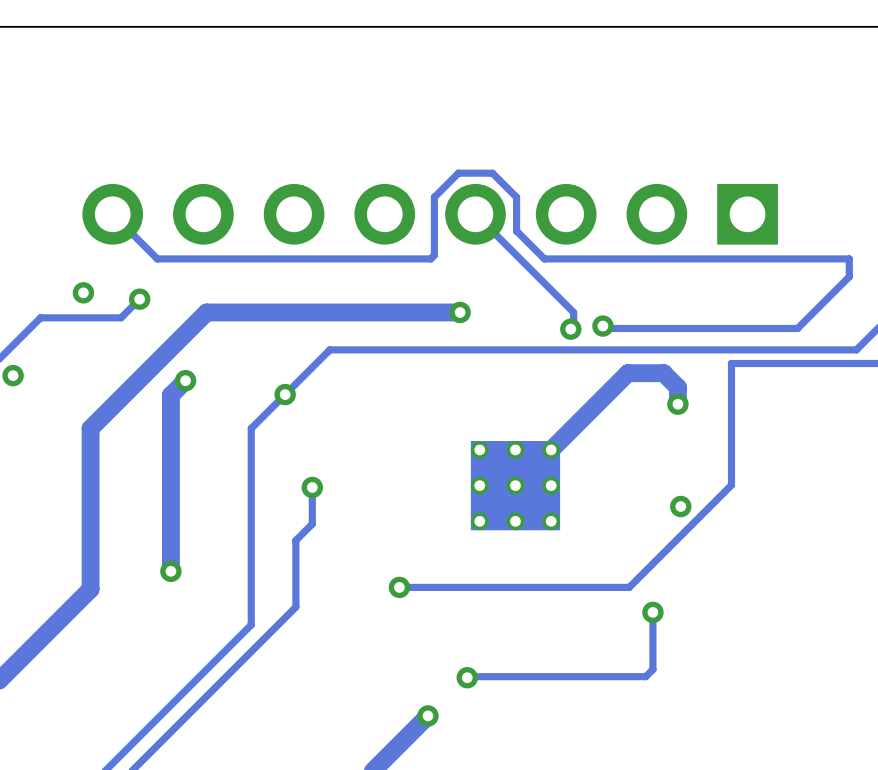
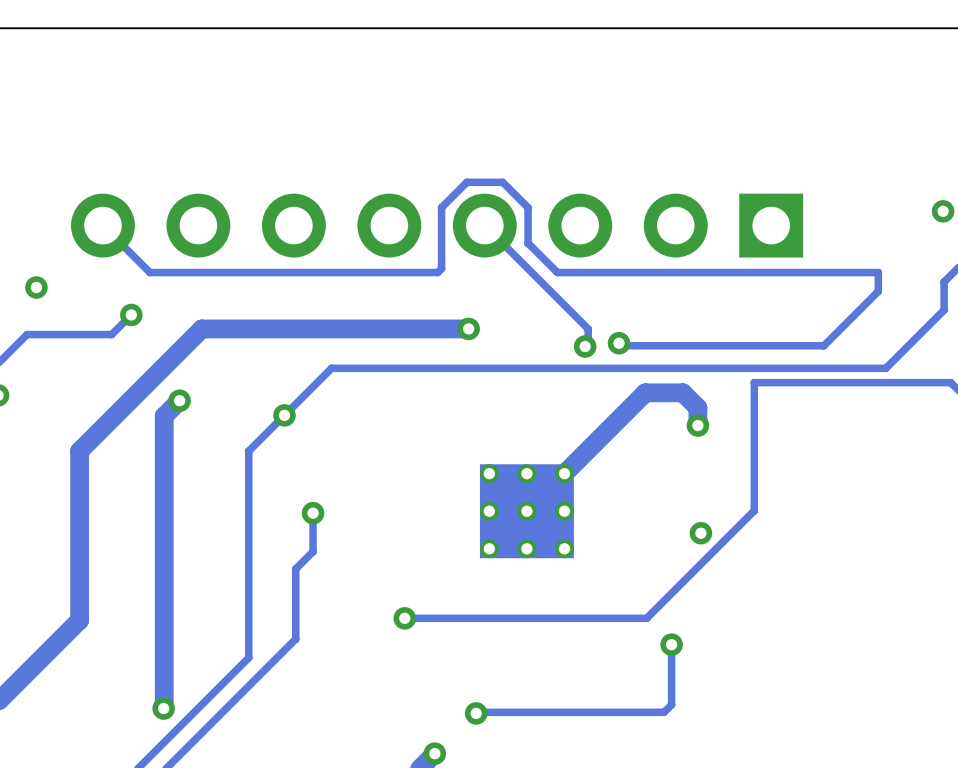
via position: (83, 292) -> (36, 287)
track: none -> (164, 601) (163, 708)
via position: (170, 571) -> (163, 708)

